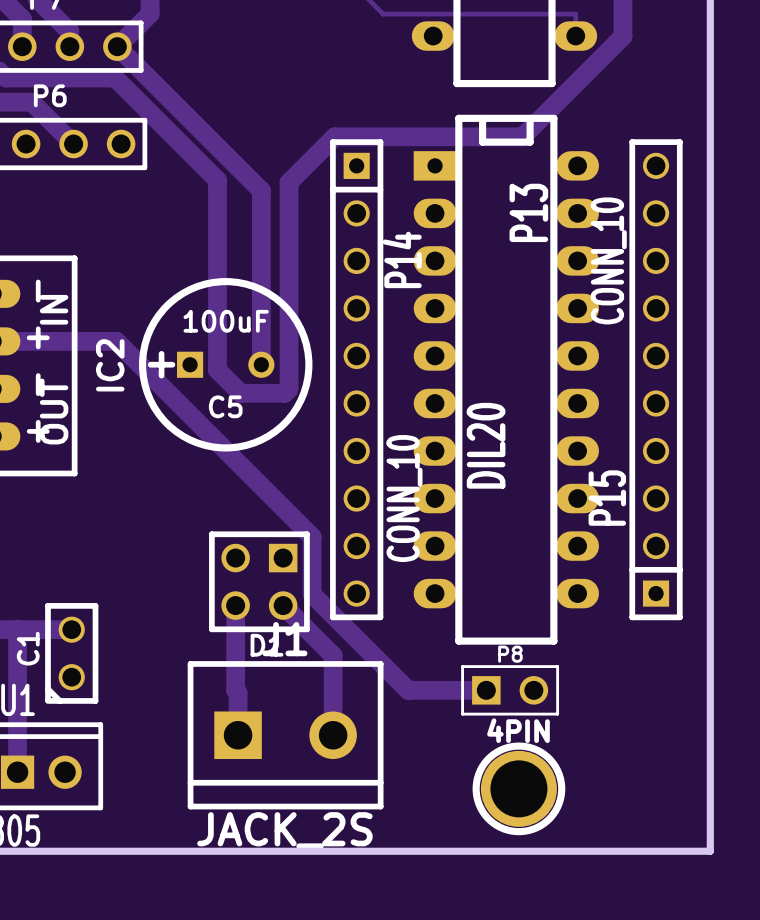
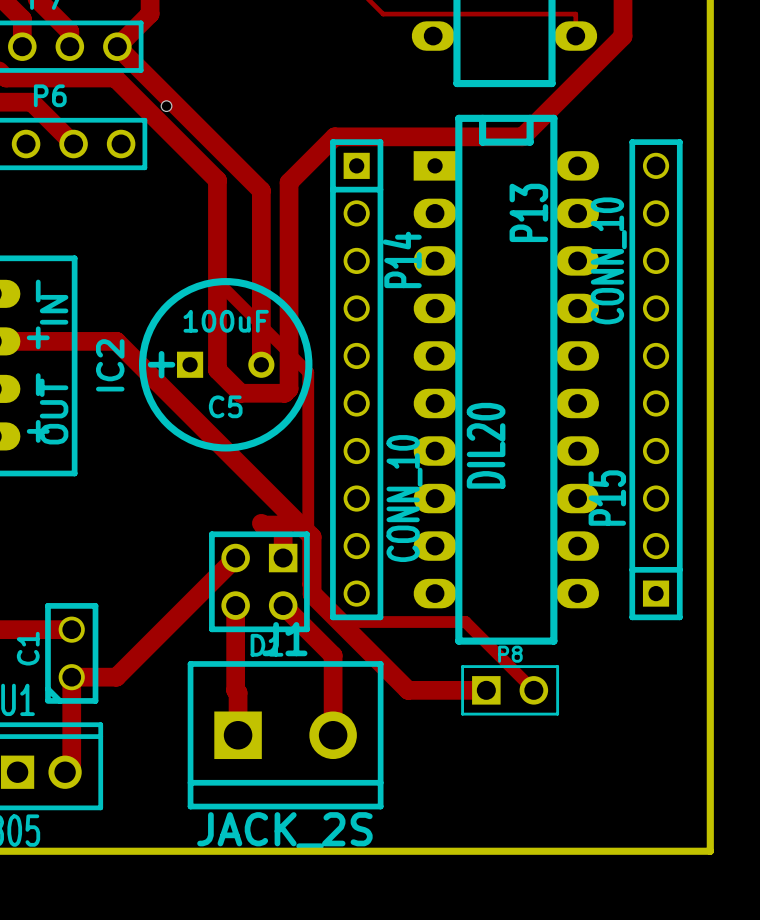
via: none -> (166, 106)
track: none -> (224, 289) (308, 372) (308, 584) (345, 622) (465, 622) (533, 690)
track: none -> (261, 523) (263, 525) (283, 525) (283, 558)
track: none -> (235, 558) (116, 677) (71, 677) (71, 765) (65, 772)
track: (17, 629) (17, 772) -> none
4PIN: (518, 788) -> none

